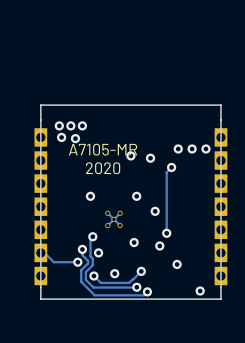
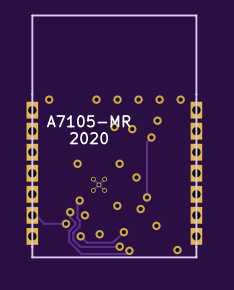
board edge: (220, 105) (40, 105) -> (196, 80) (196, 15) (32, 15) (32, 80)
via: (70, 125) -> none
via: (82, 125) -> none
via: none -> (96, 99)
via: none -> (117, 99)
via: none -> (138, 99)
via: none -> (159, 99)
via: none -> (180, 99)
via: (61, 137) -> none
via: (75, 138) -> none
via: (192, 148) -> none
via: (205, 148) -> none

